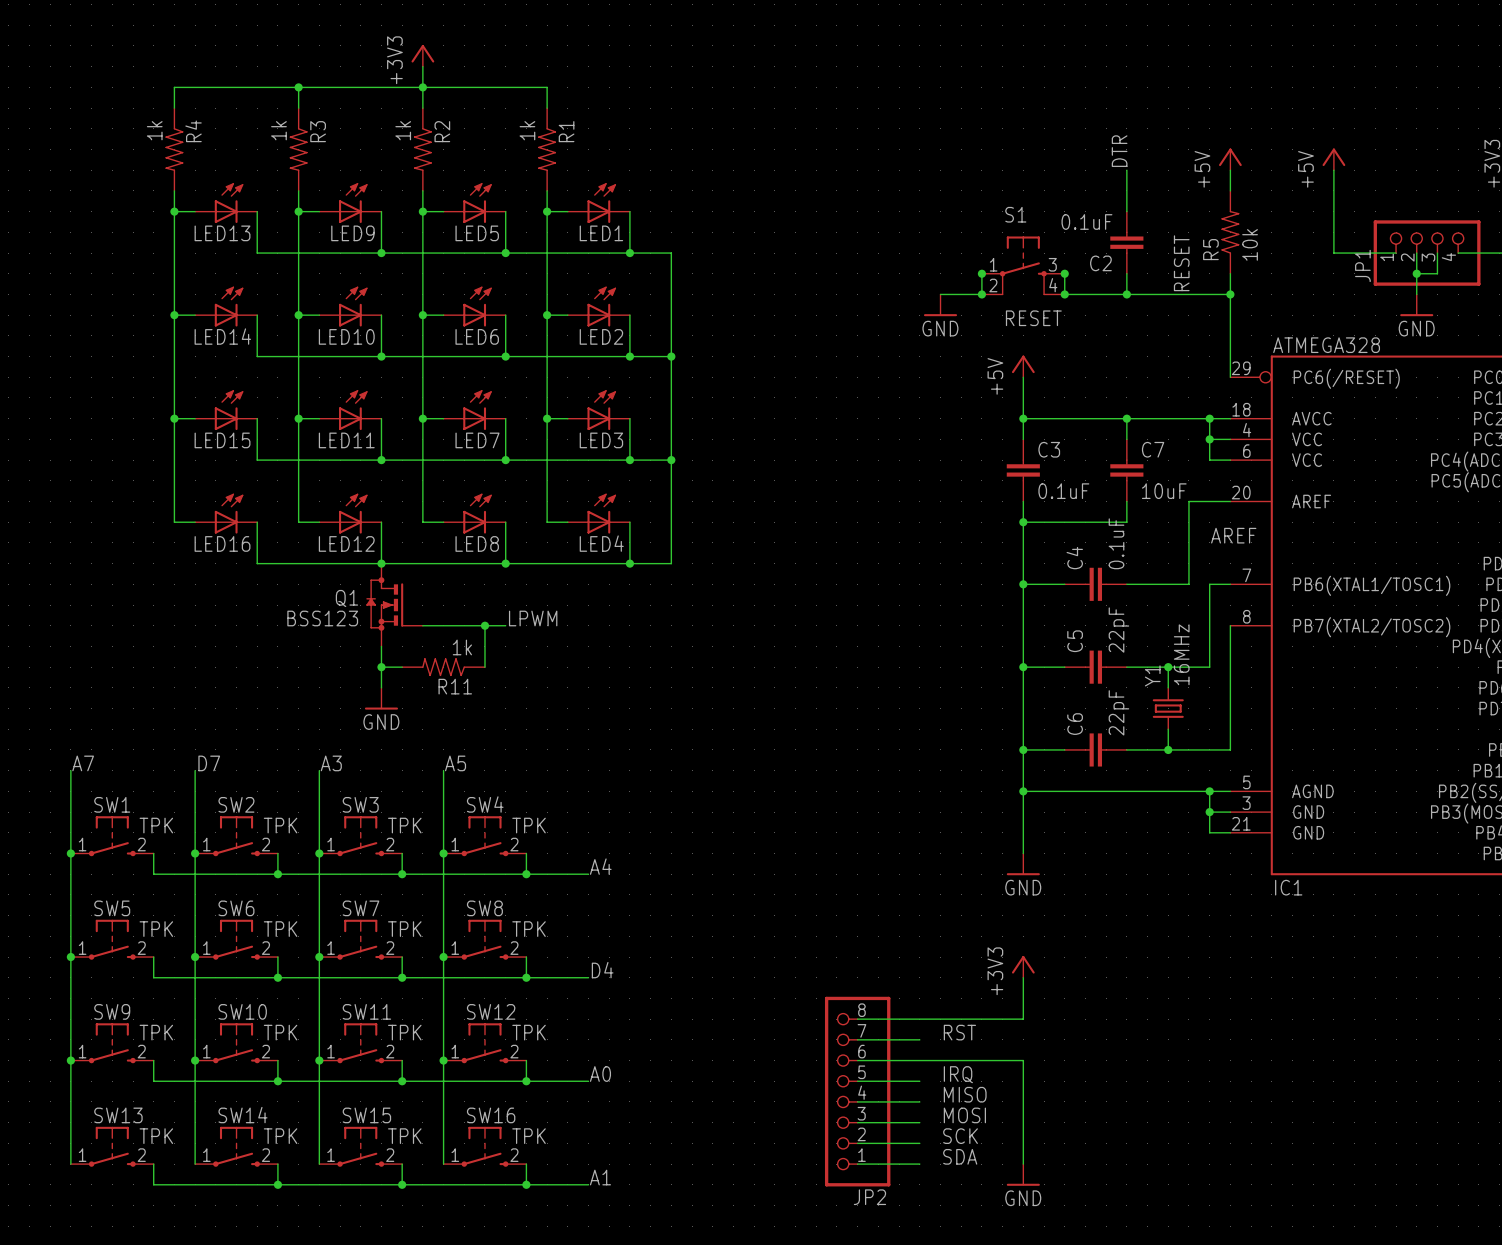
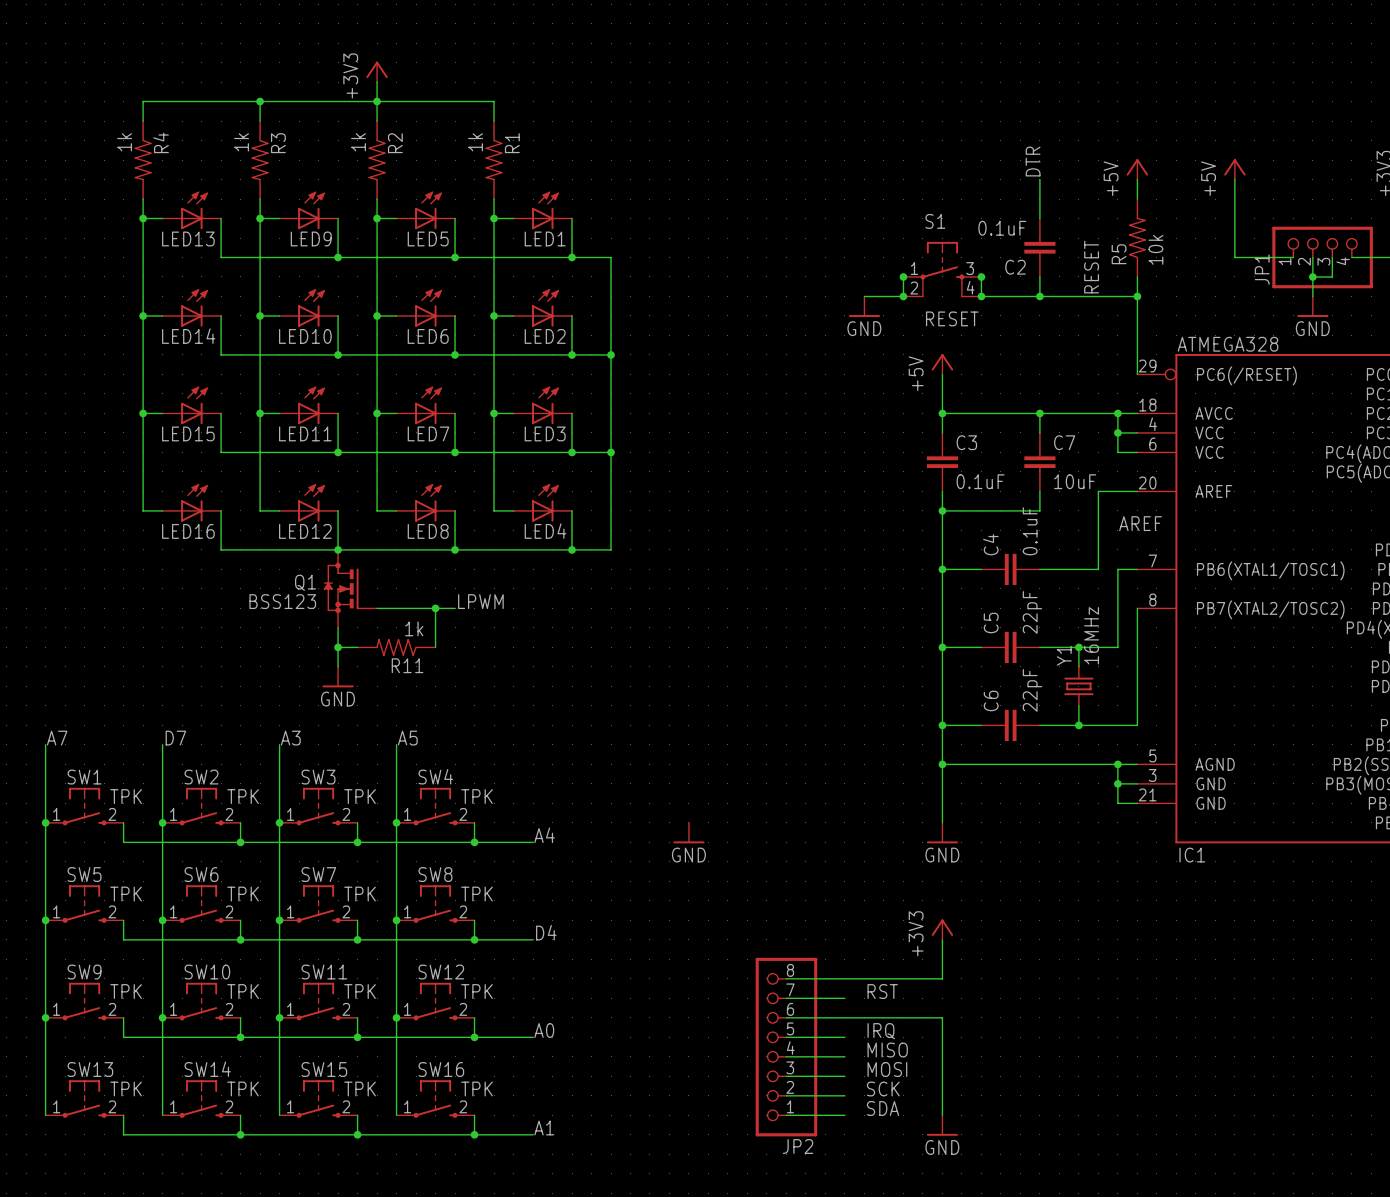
power symbol: none -> GND (688, 833)

